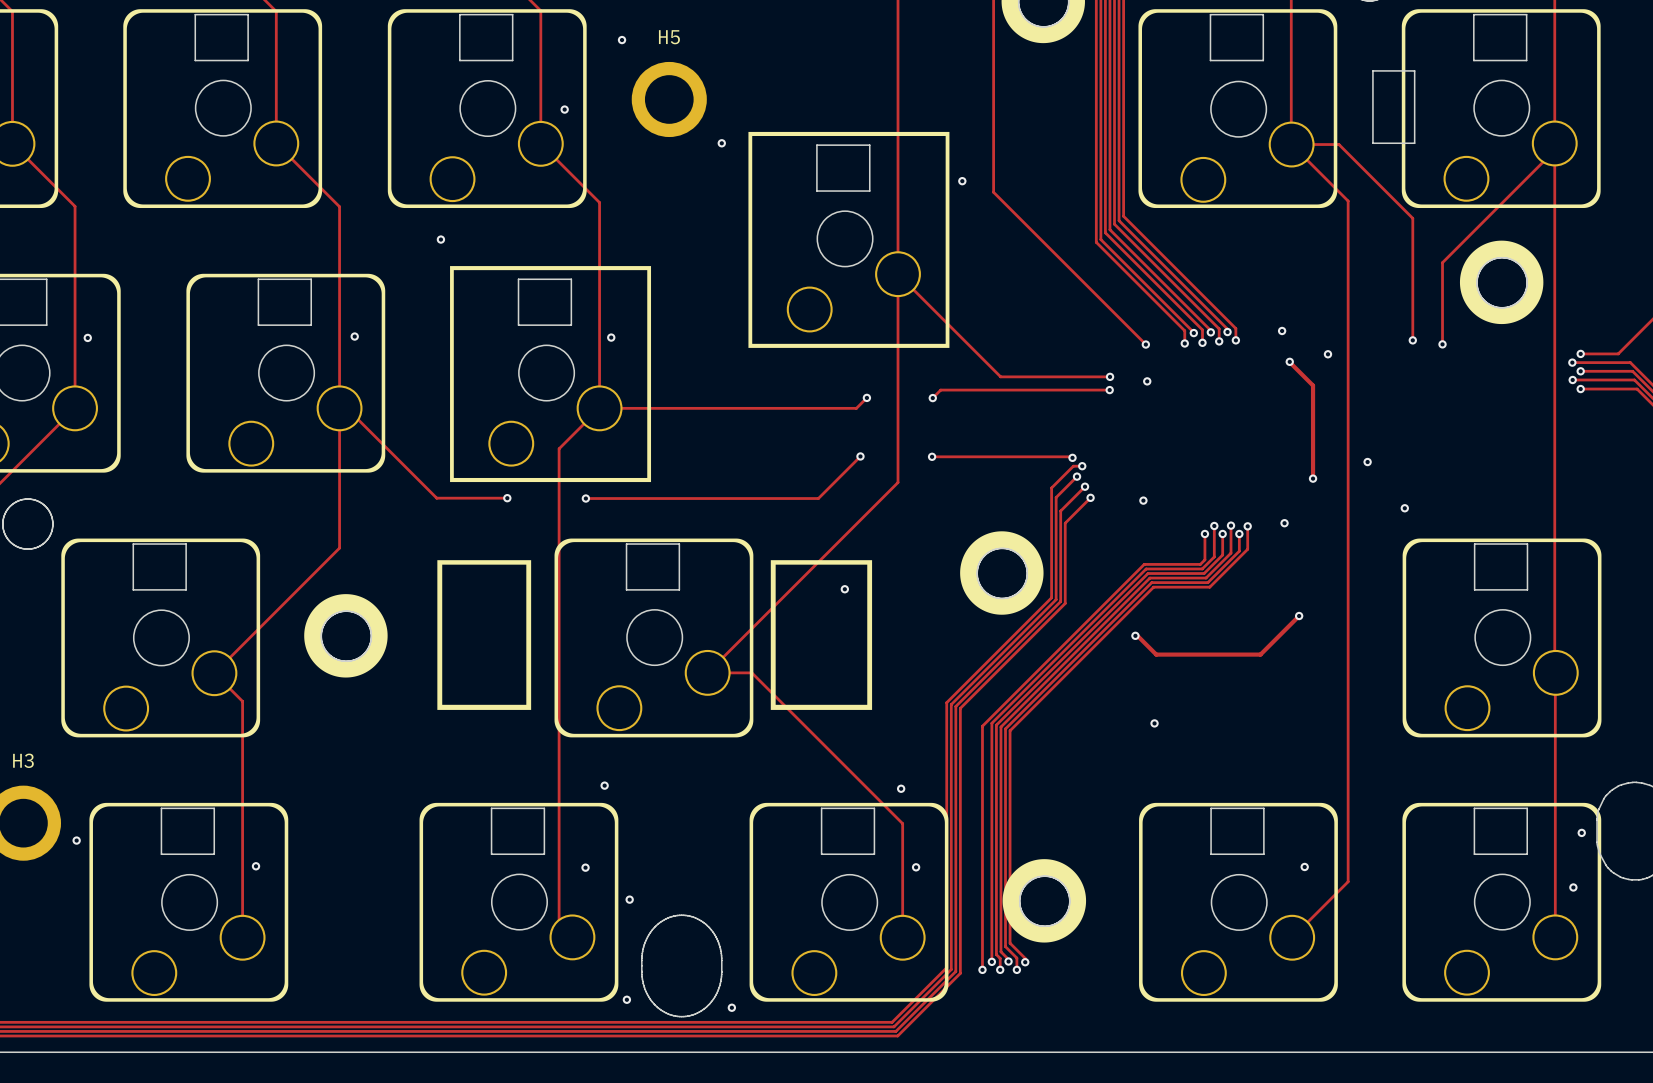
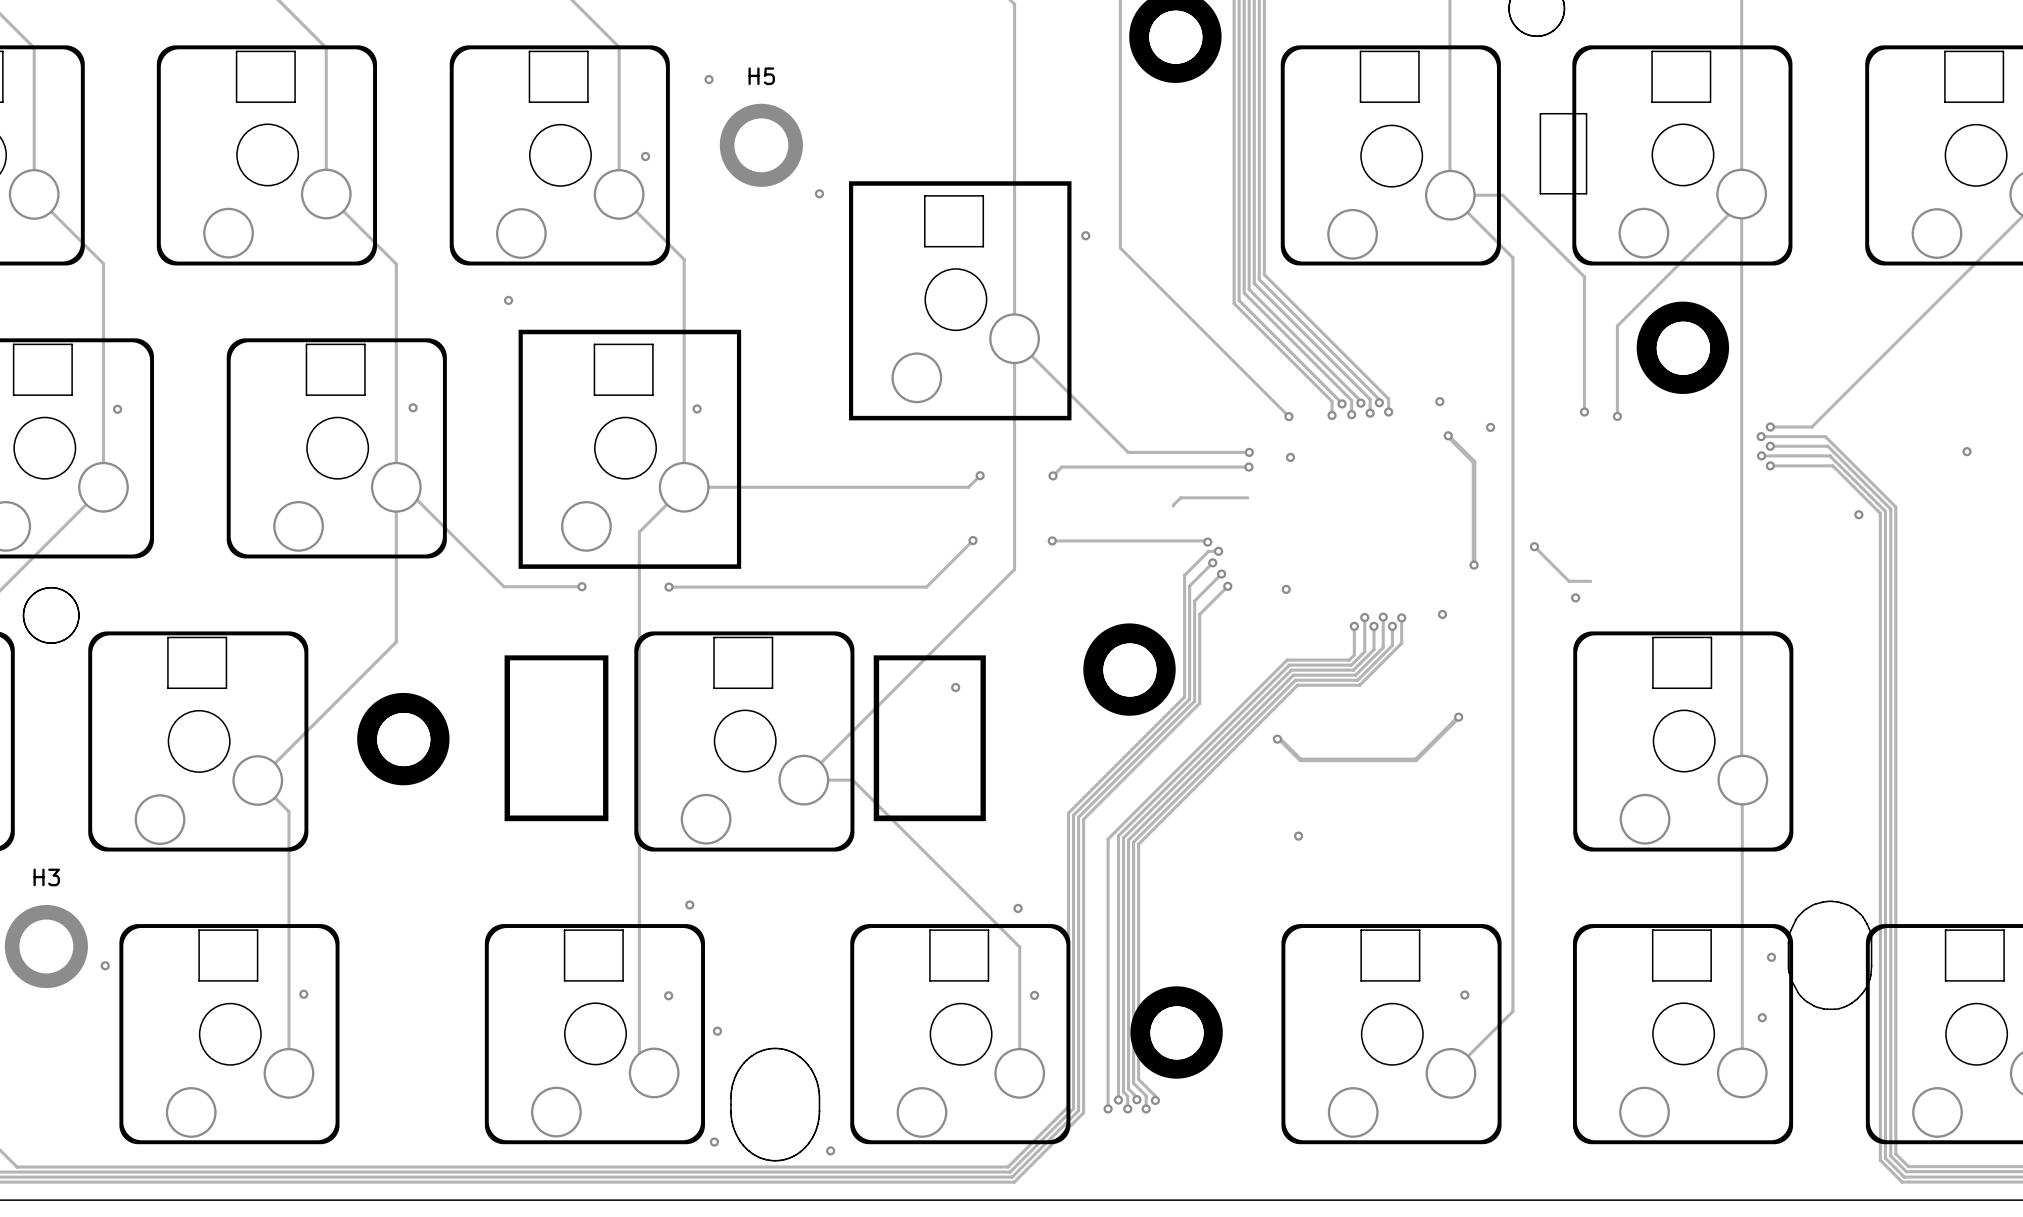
track: none -> (1247, 497) (1180, 497) (1173, 505)
track: none -> (1534, 546) (1569, 581) (1590, 581)

